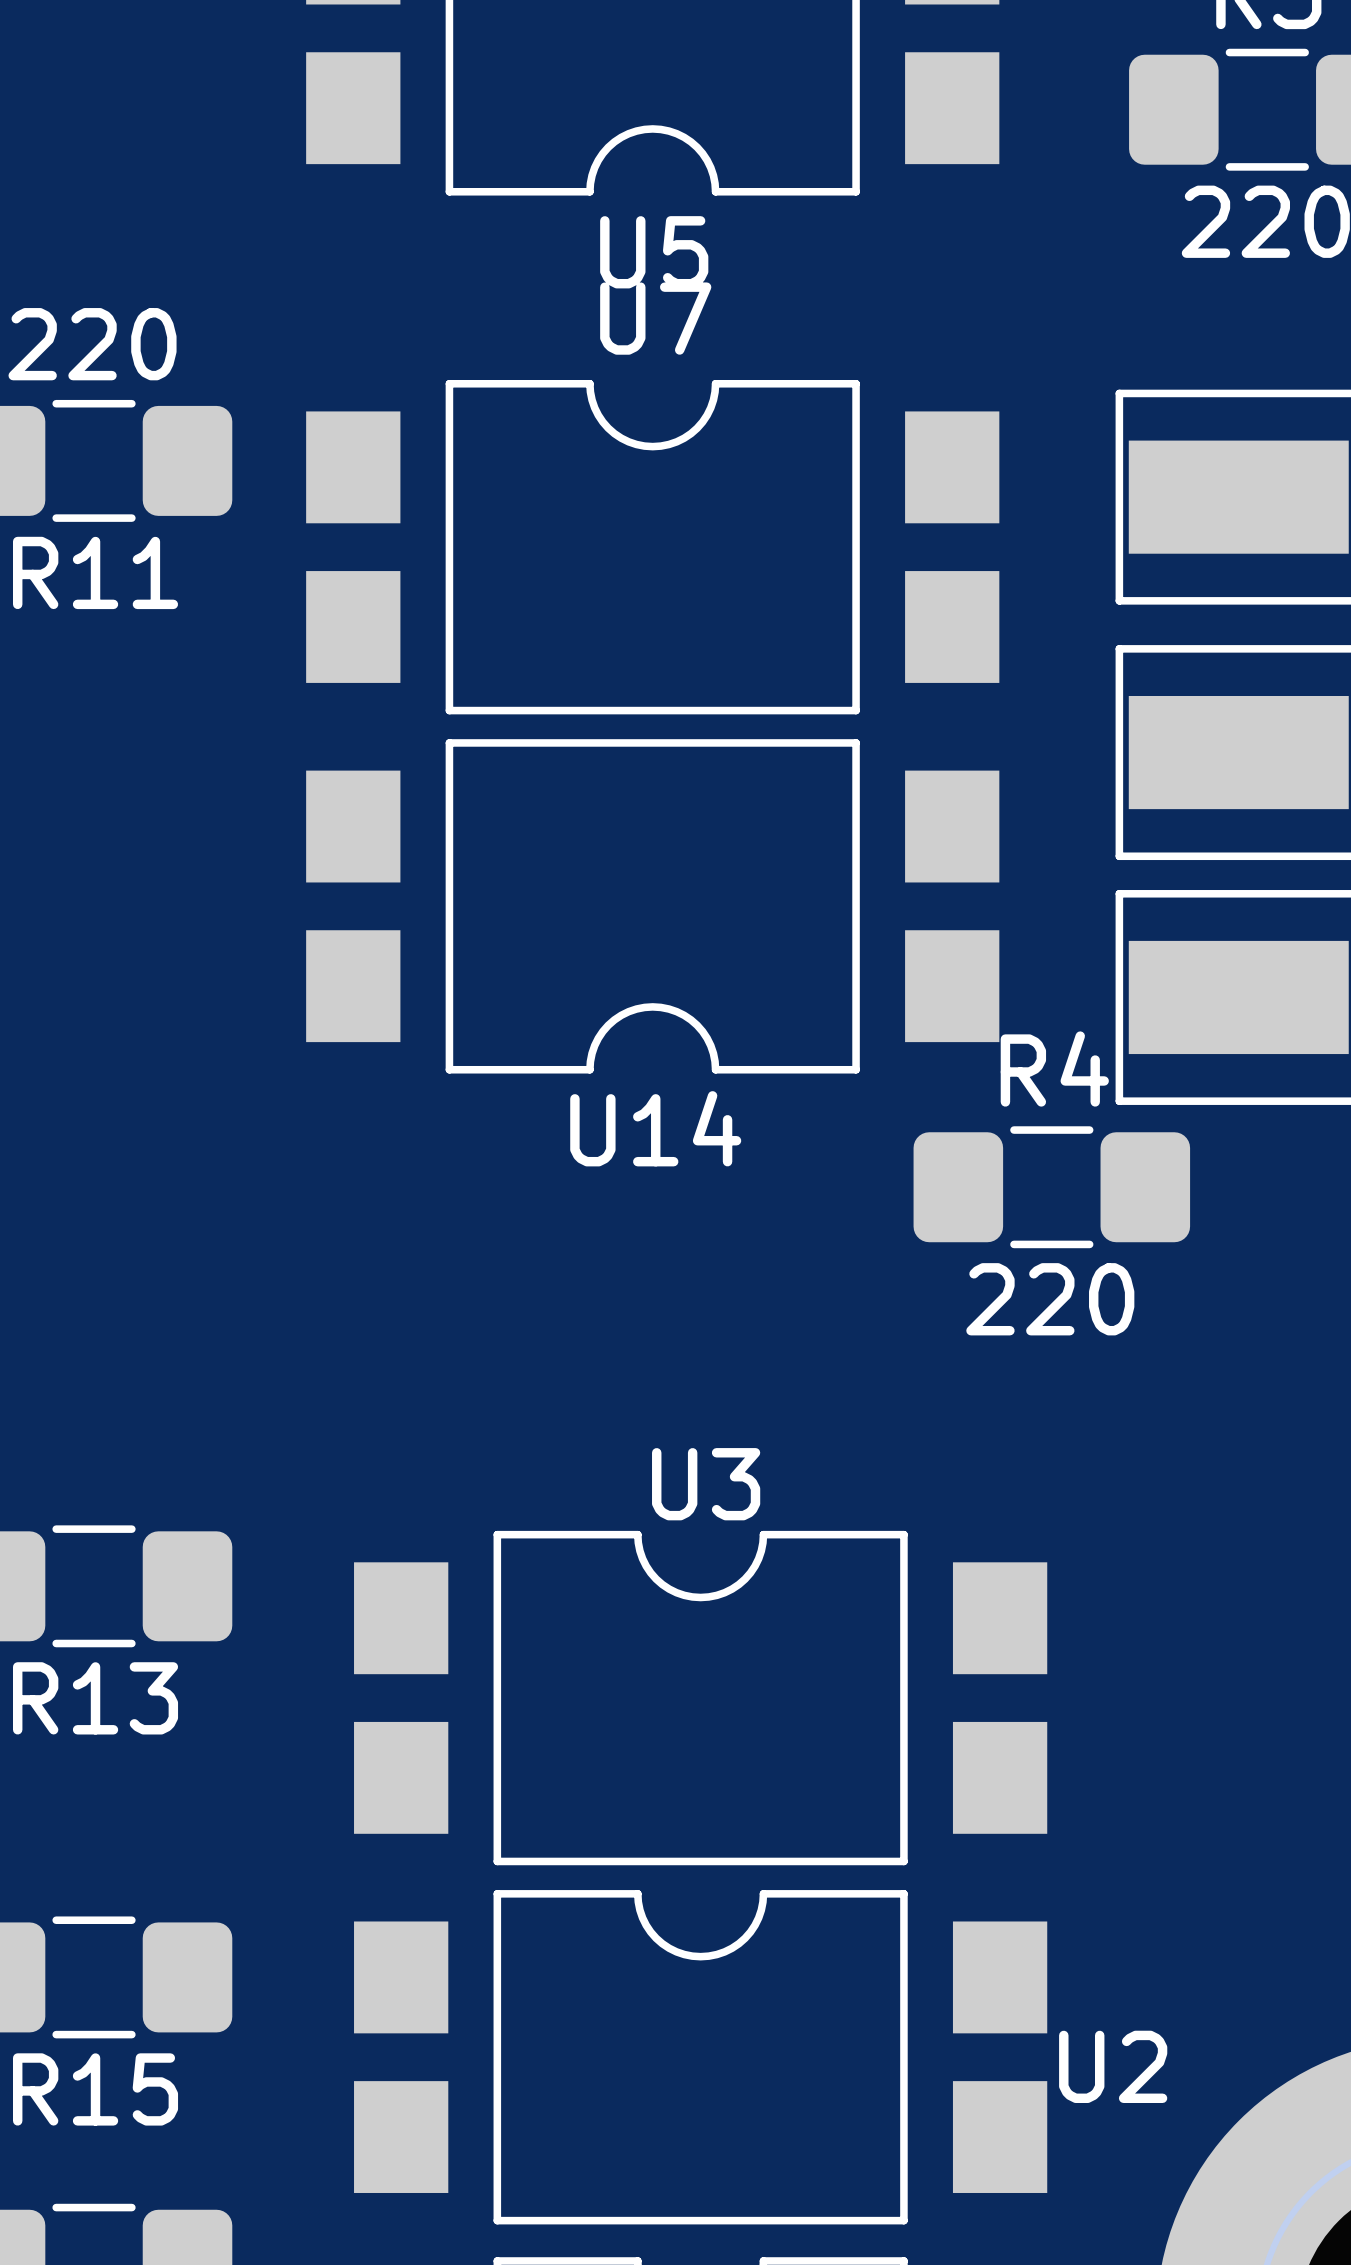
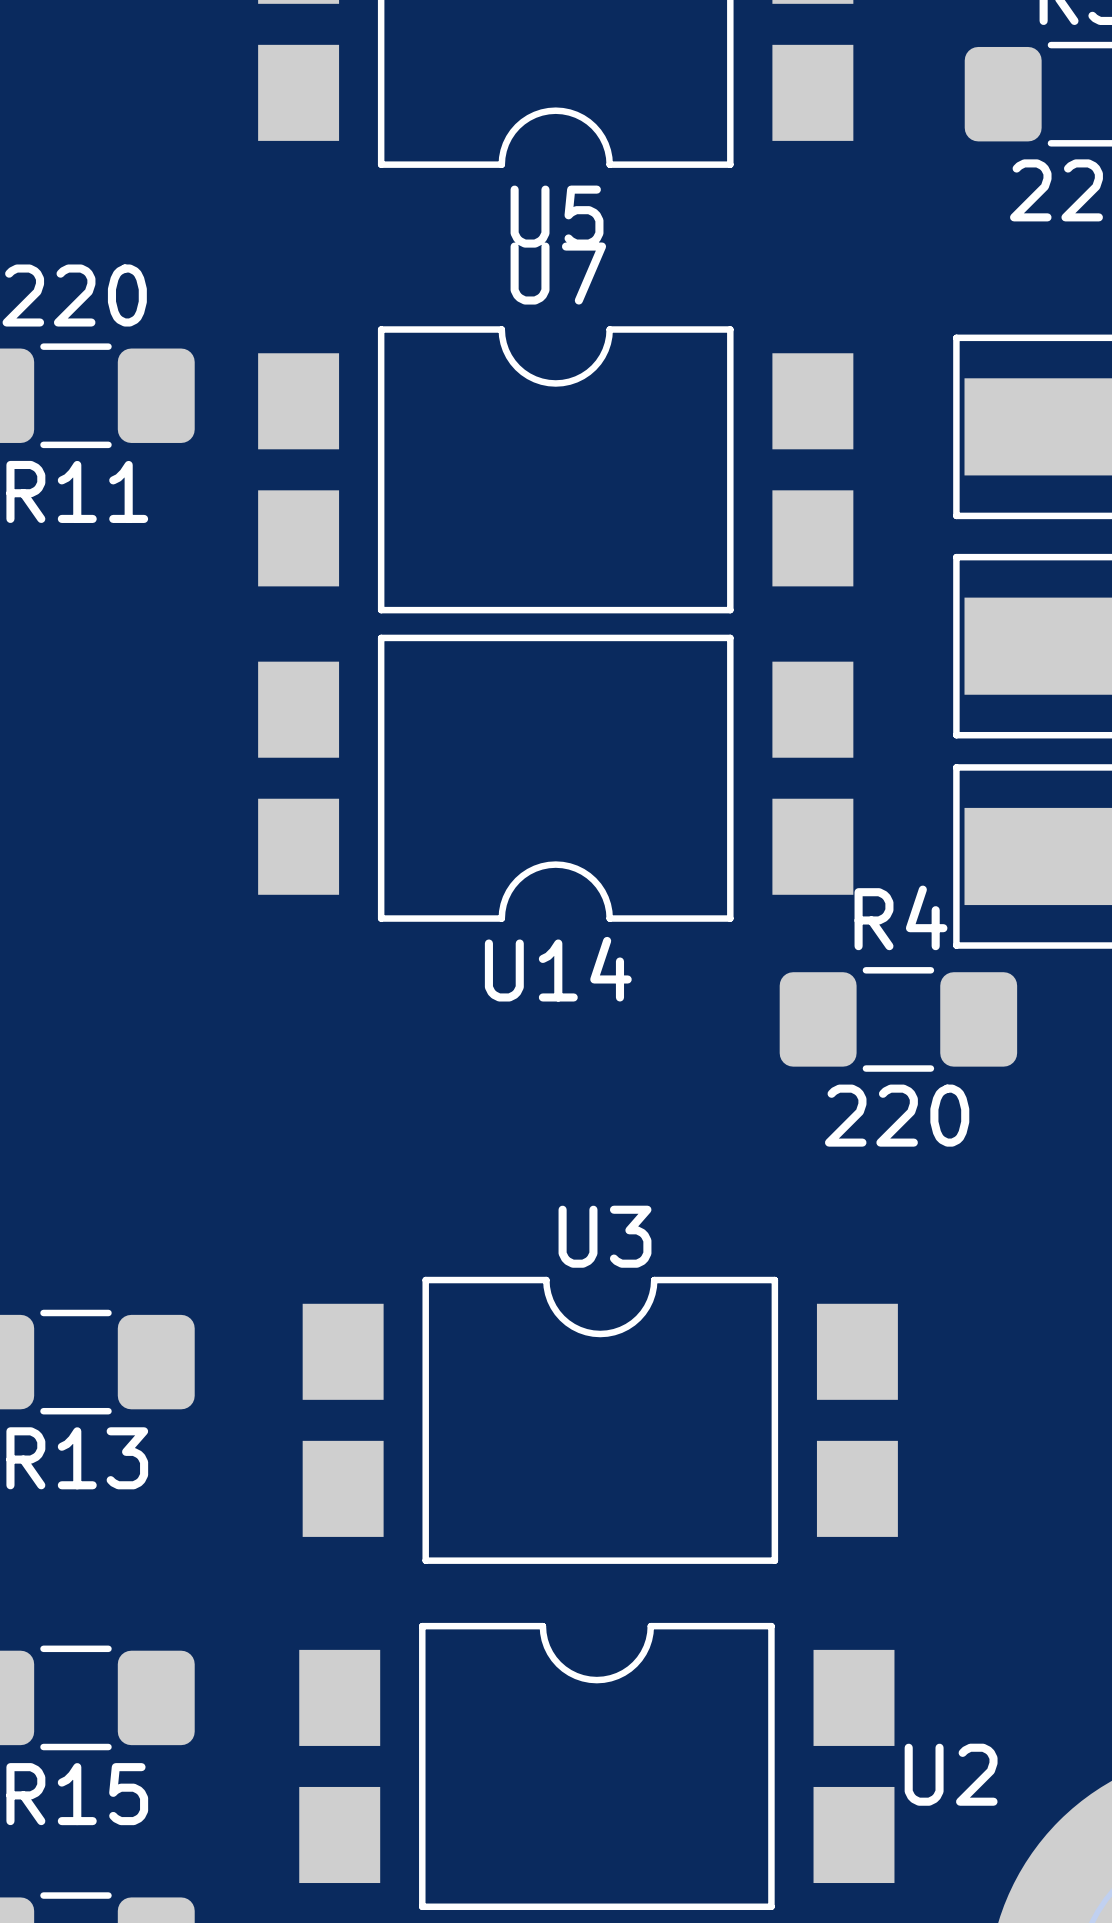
U3 position: (700, 1698) -> (600, 1420)

